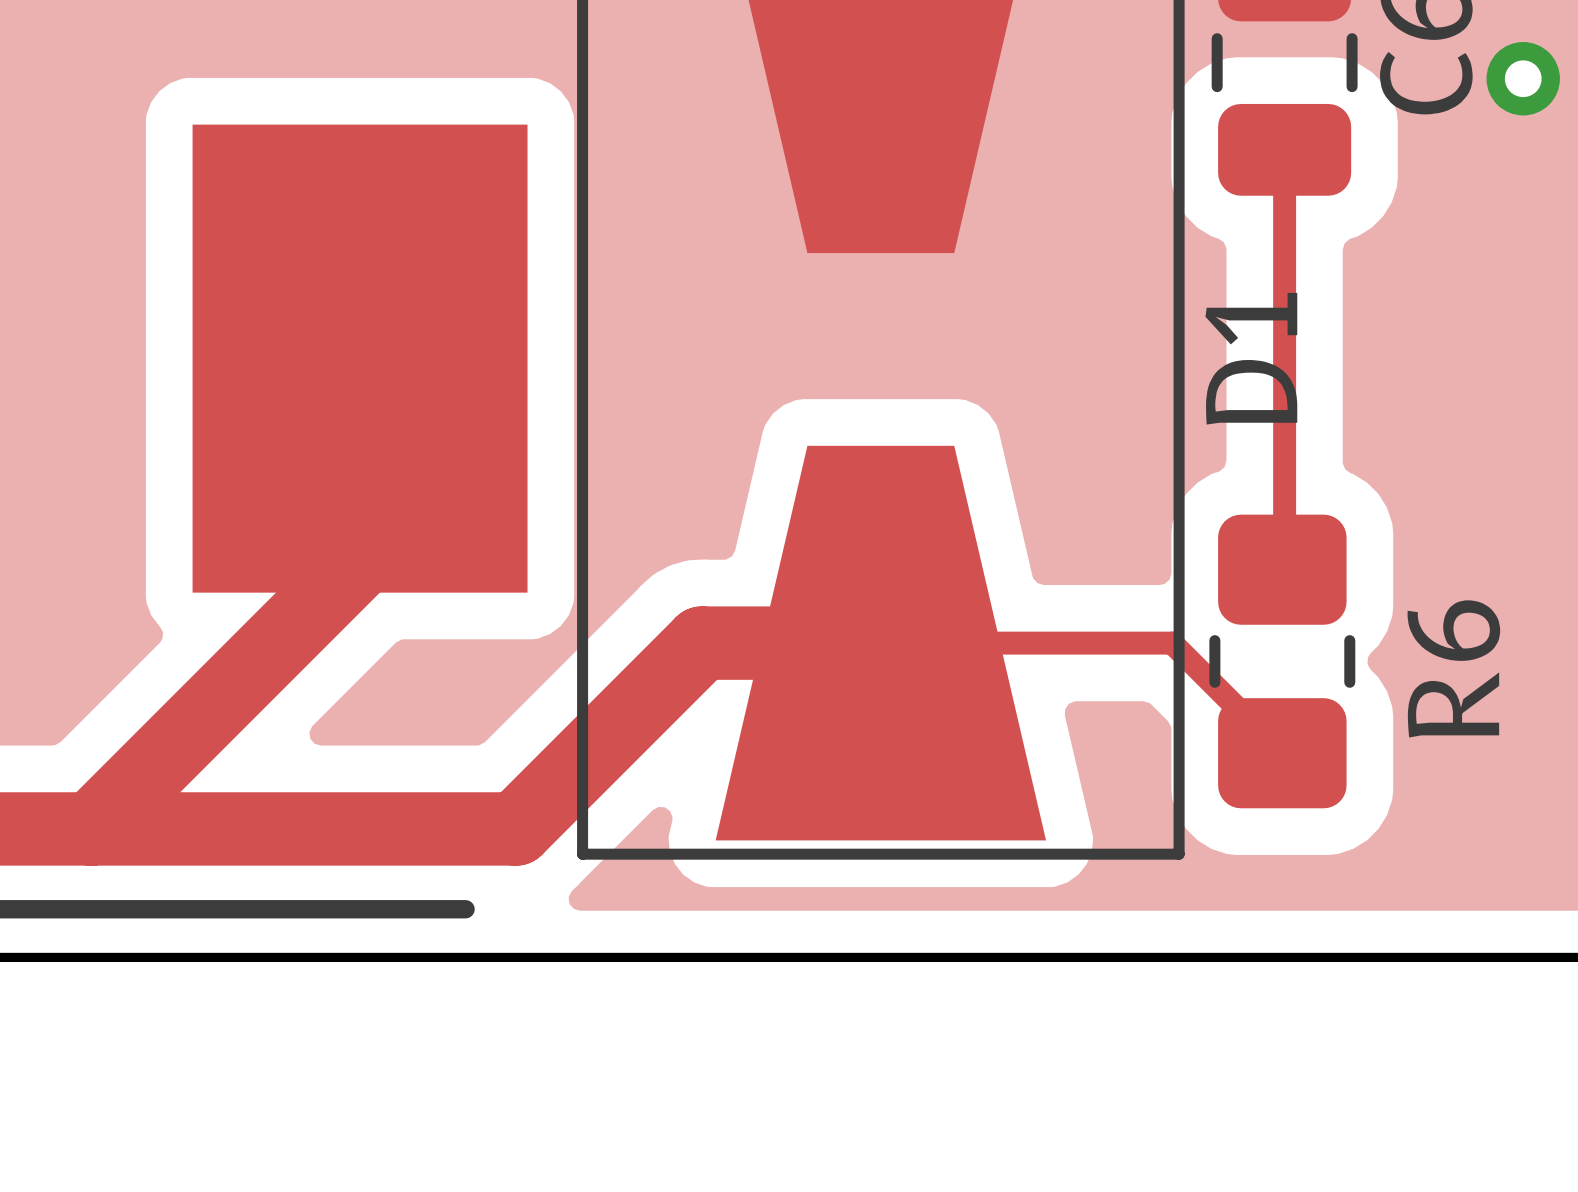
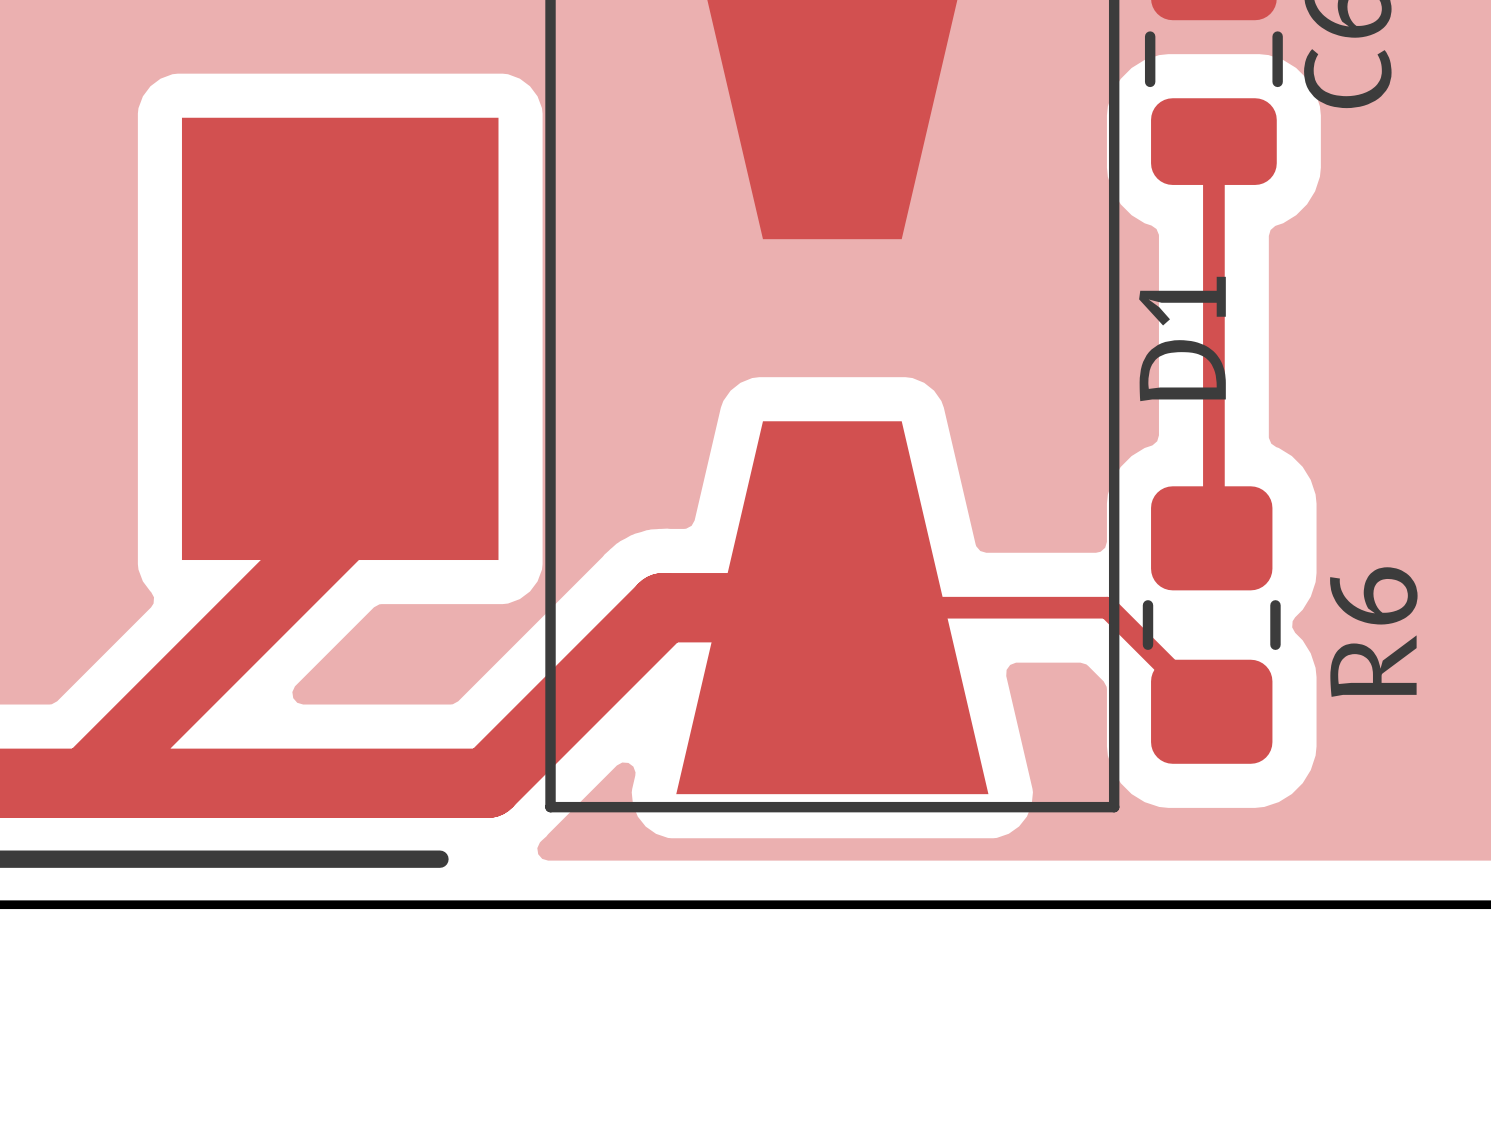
via: (1523, 78) -> none

